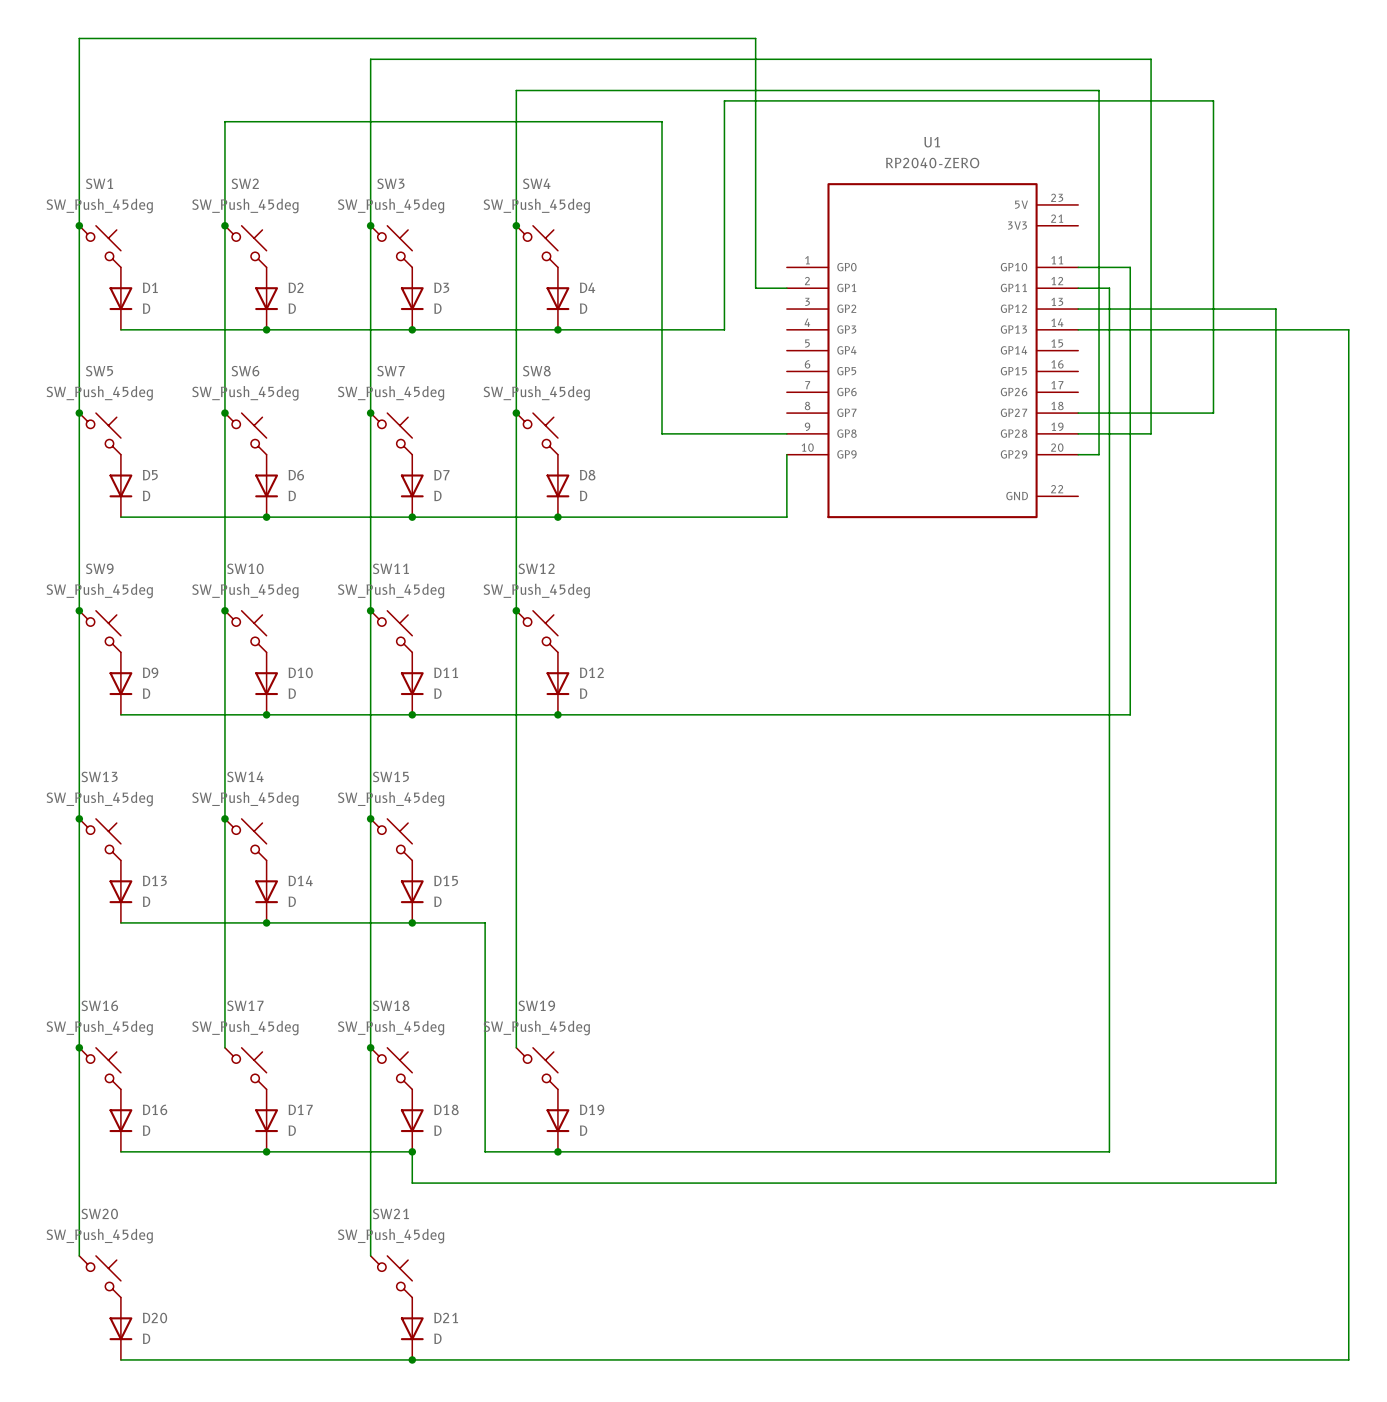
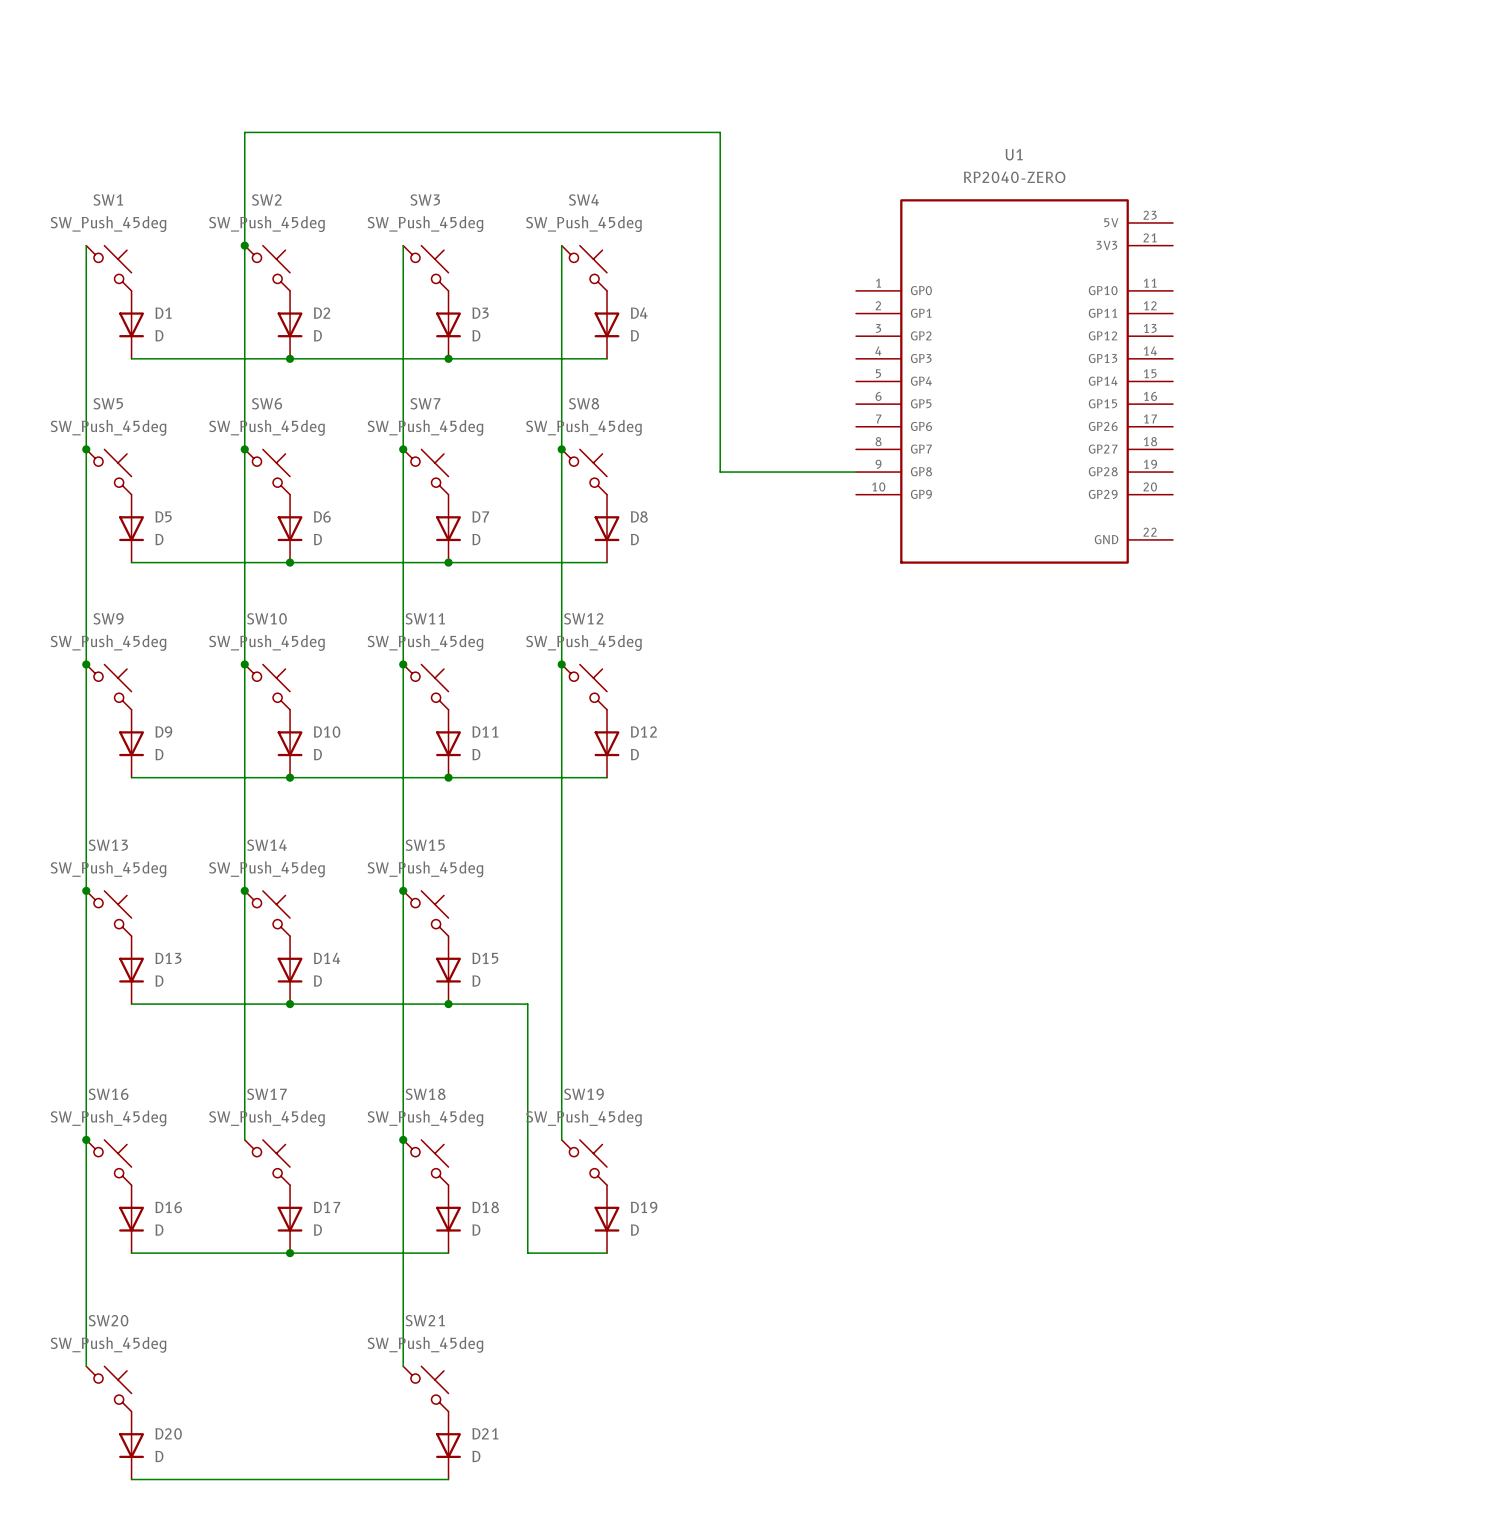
wire: (79, 225) (79, 38) (755, 38) (755, 288) (786, 288) -> none
junction: (79, 225) -> none
wire: (370, 225) (370, 59) (1151, 59) (1151, 433) (1078, 433) -> none
junction: (370, 225) -> none
wire: (516, 225) (516, 90) (1099, 90) (1099, 454) (1078, 454) -> none
junction: (516, 225) -> none
wire: (1078, 267) (1130, 267) (1130, 714) (557, 714) -> none
wire: (1078, 288) (1109, 288) (1109, 1151) (557, 1151) -> none
wire: (1078, 309) (1275, 309) (1275, 1183) (412, 1183) (412, 1151) -> none
wire: (557, 329) (724, 329) (724, 100) (1213, 100) (1213, 413) (1078, 413) -> none
junction: (557, 329) -> none
wire: (1078, 329) (1348, 329) (1348, 1359) (412, 1359) -> none
wire: (786, 454) (786, 517) (557, 517) -> none
junction: (557, 517) -> none
junction: (557, 714) -> none
junction: (412, 1151) -> none
junction: (557, 1151) -> none
junction: (412, 1359) -> none

